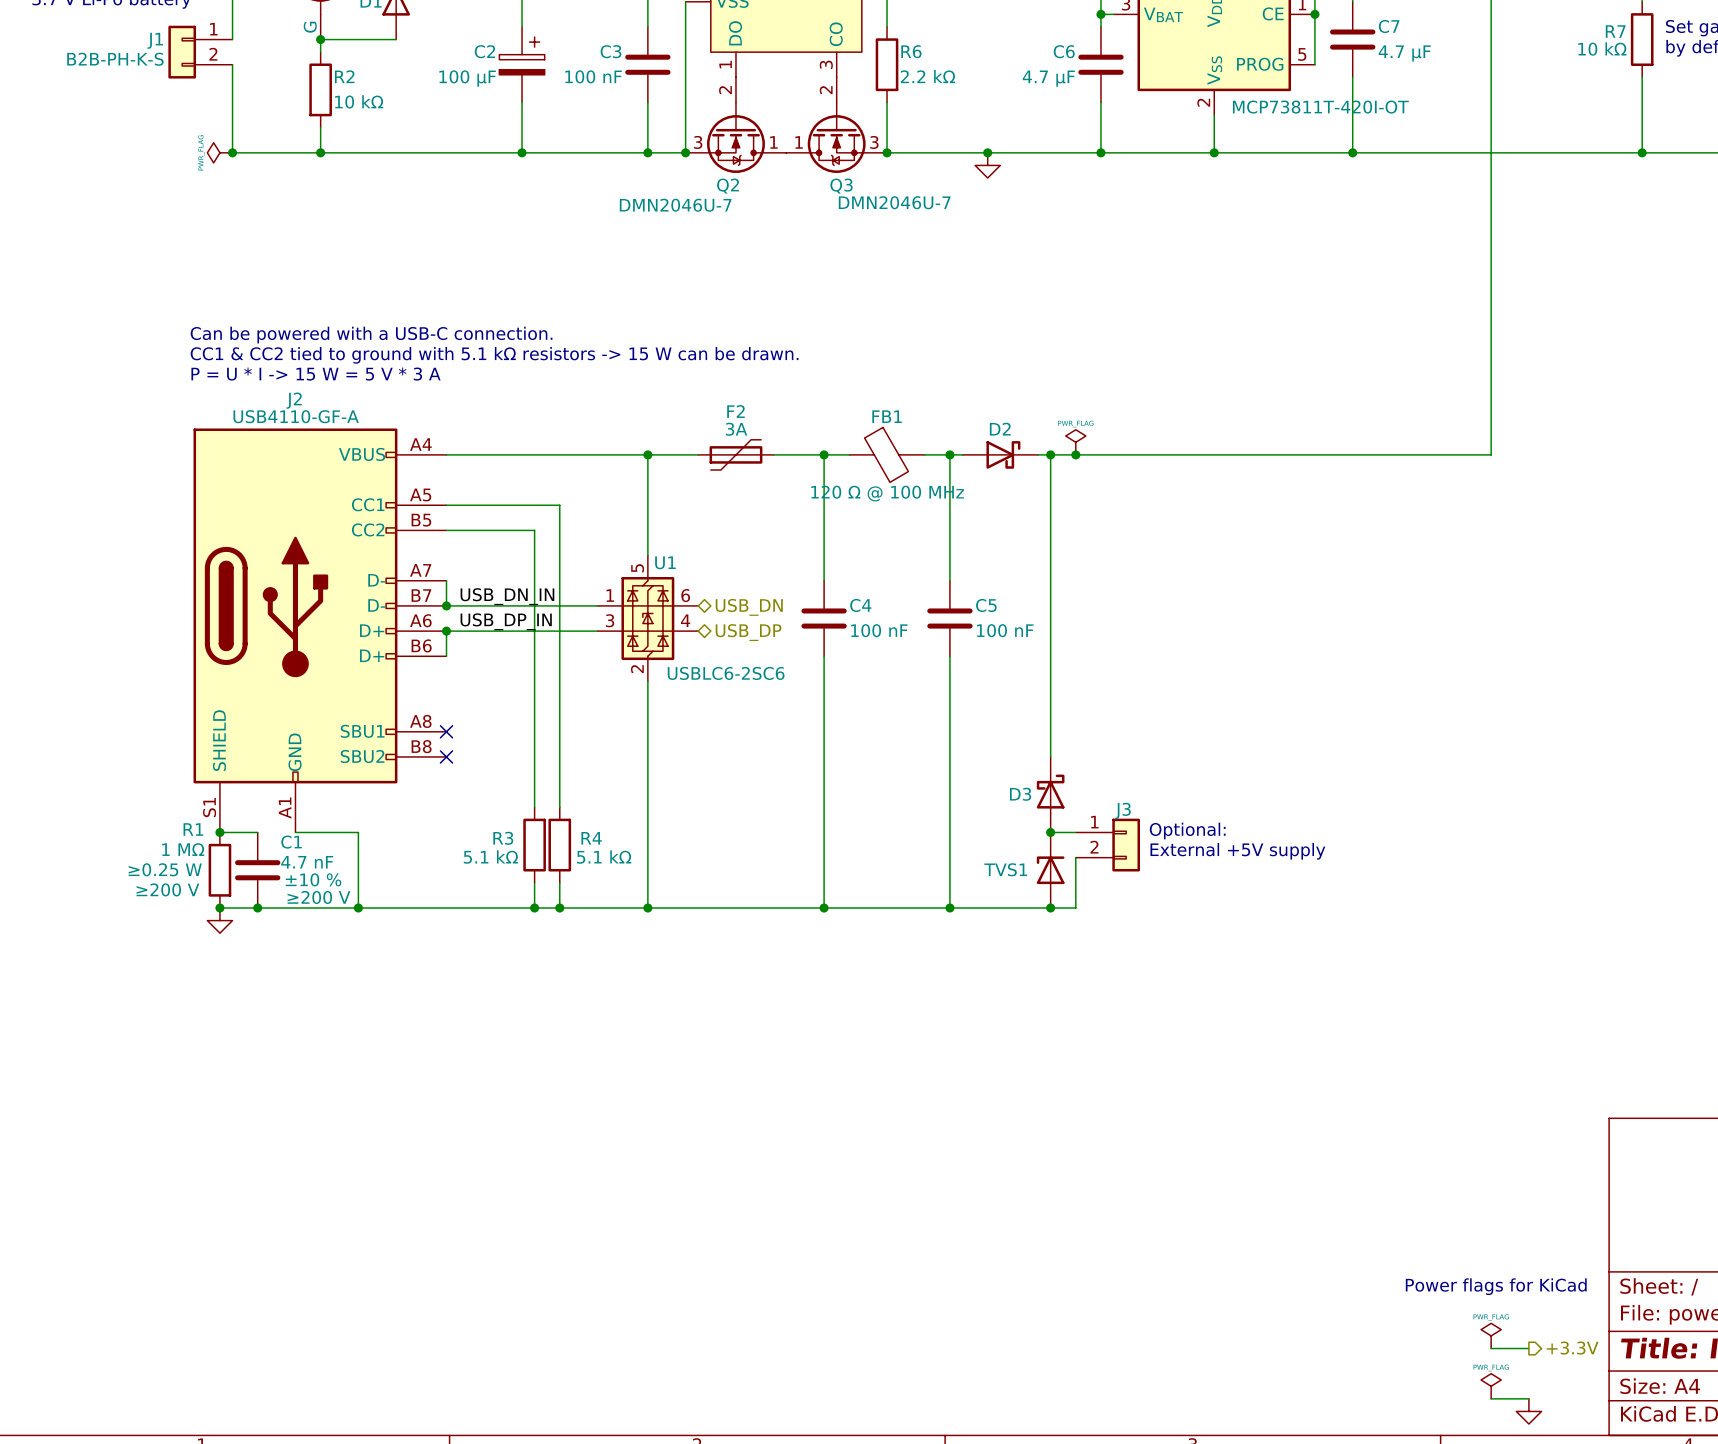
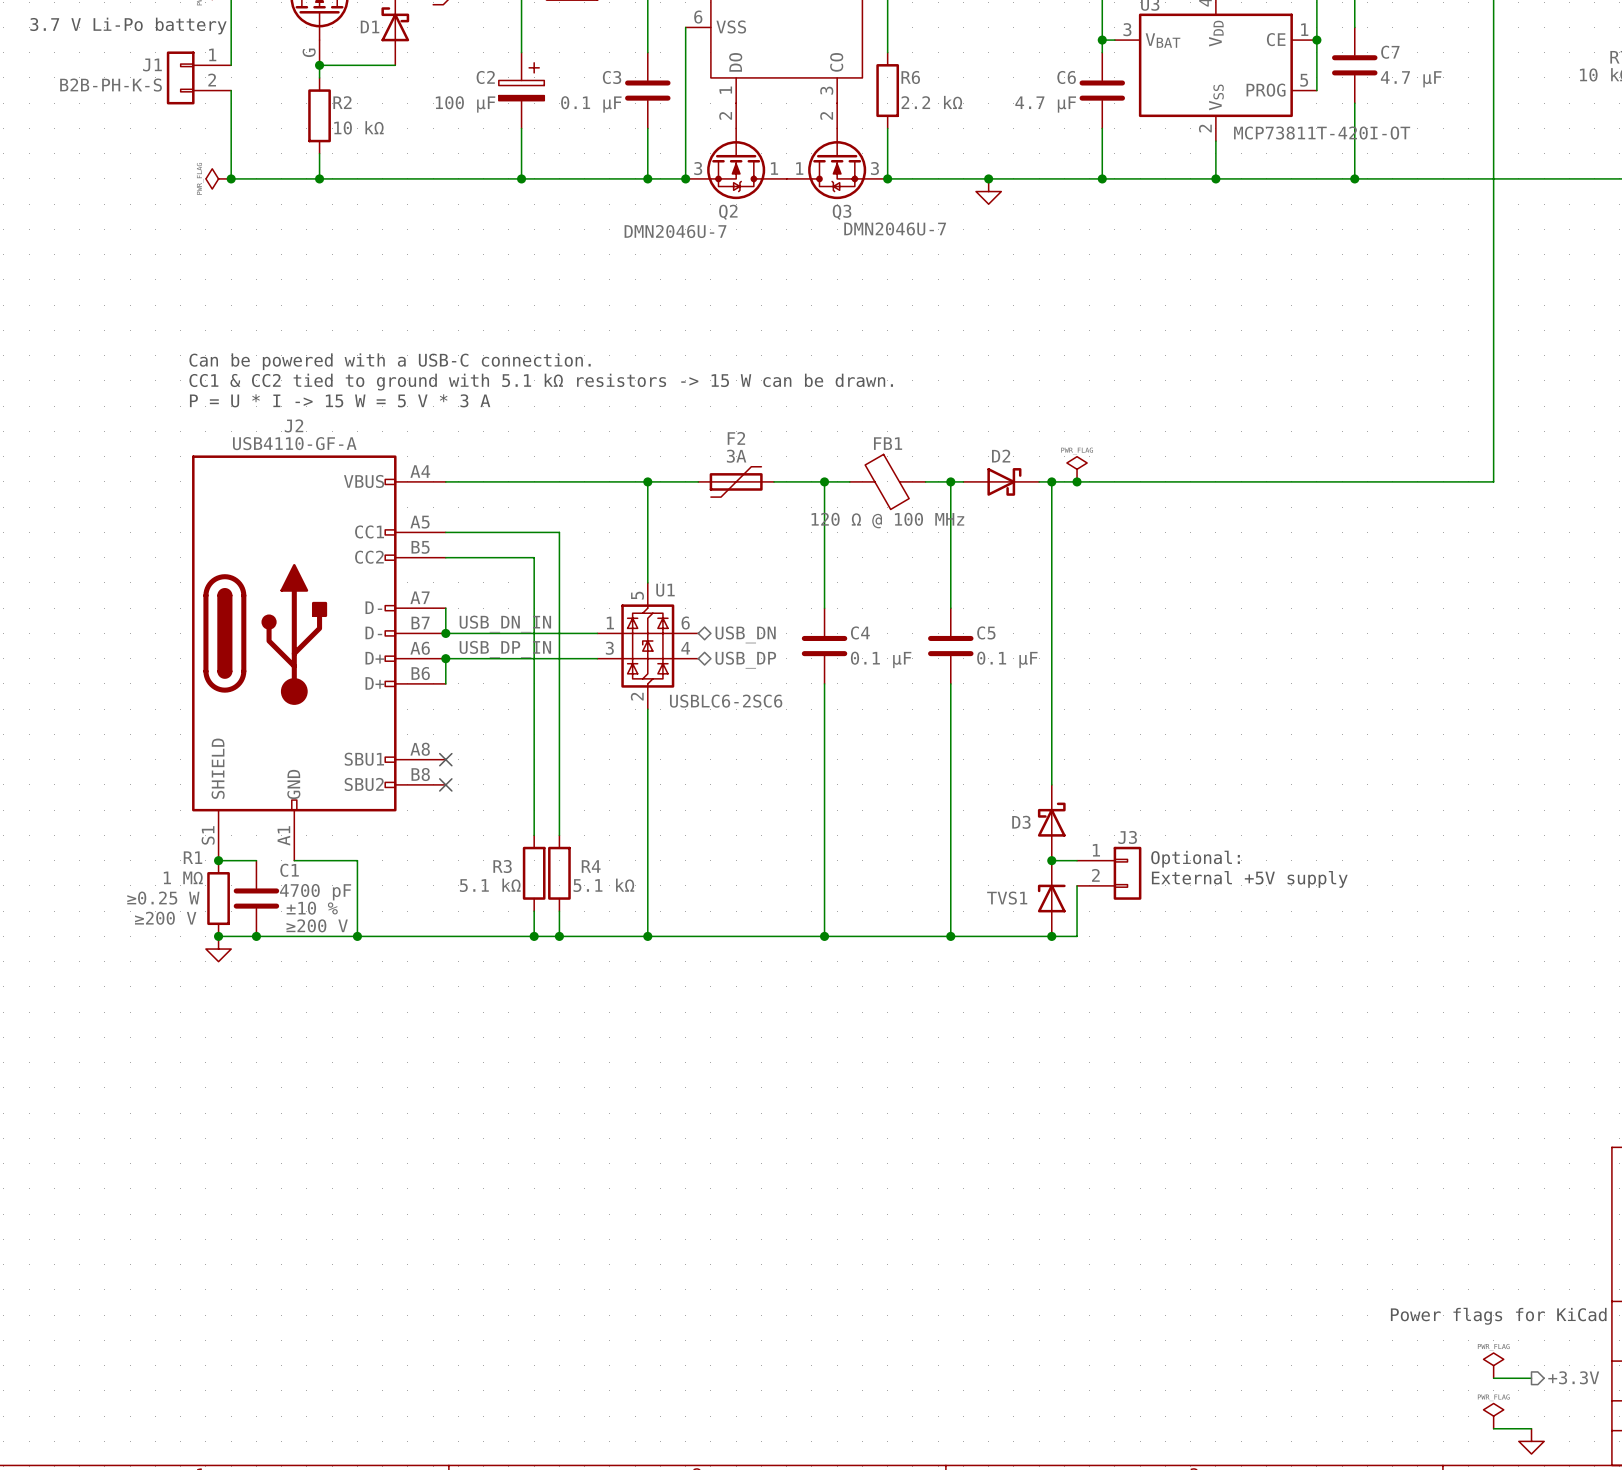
C3 value: 100 nF (593, 76) -> 0.1 µF (591, 104)
C4 value: 100 nF (879, 630) -> 0.1 µF (881, 659)
C5 value: 100 nF (1005, 630) -> 0.1 µF (1007, 659)
C1 value: 4.7 nF (307, 862) -> 4700 pF (315, 892)

